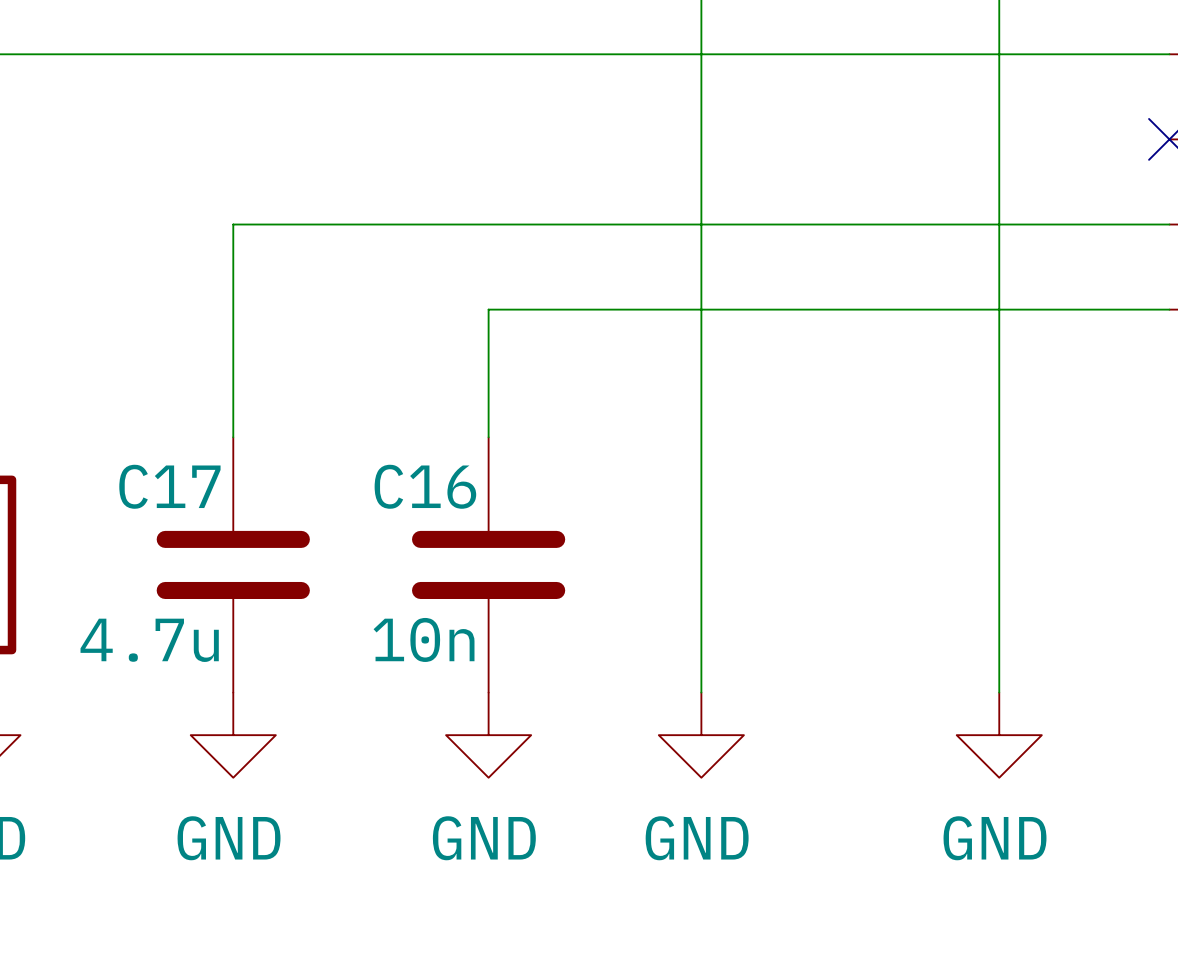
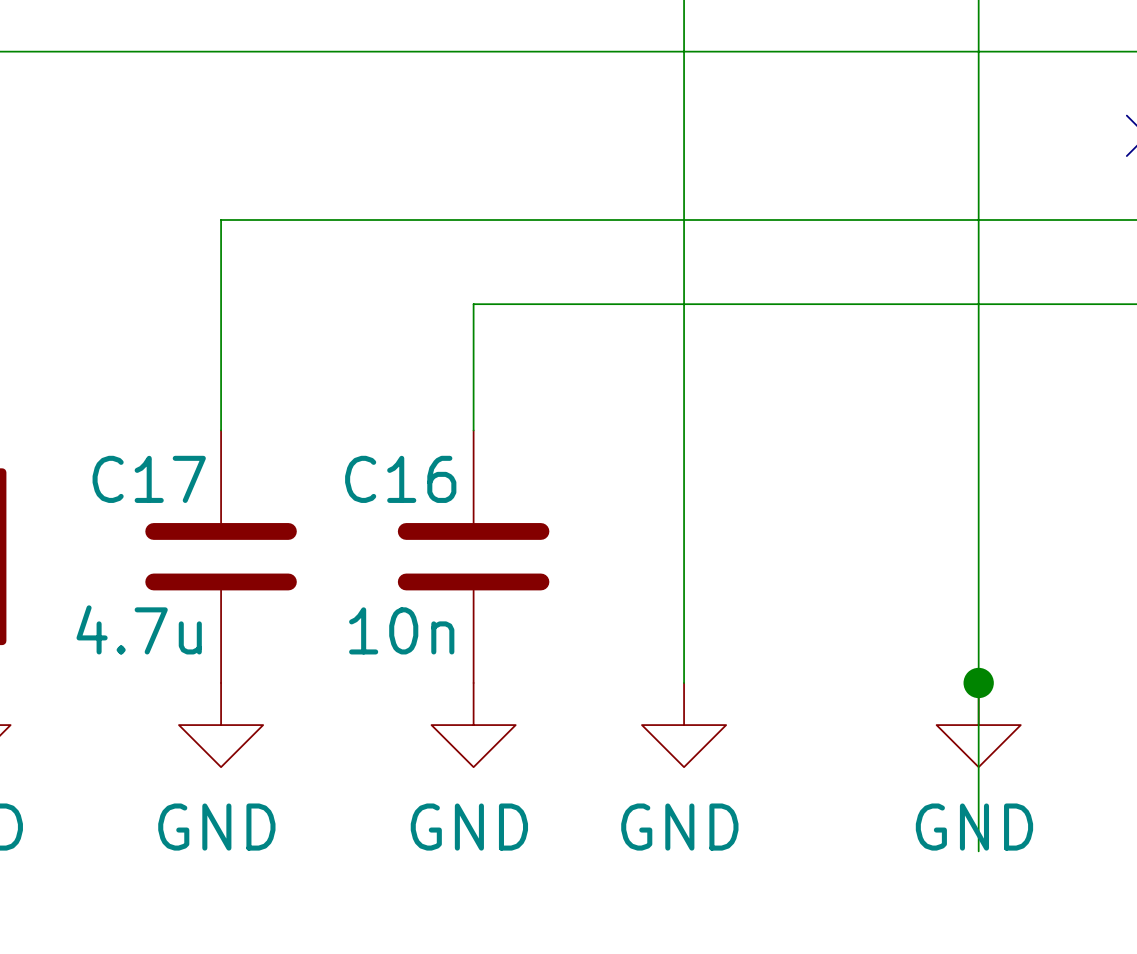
wire: none -> (978, 682) (978, 851)
junction: none -> (978, 682)

